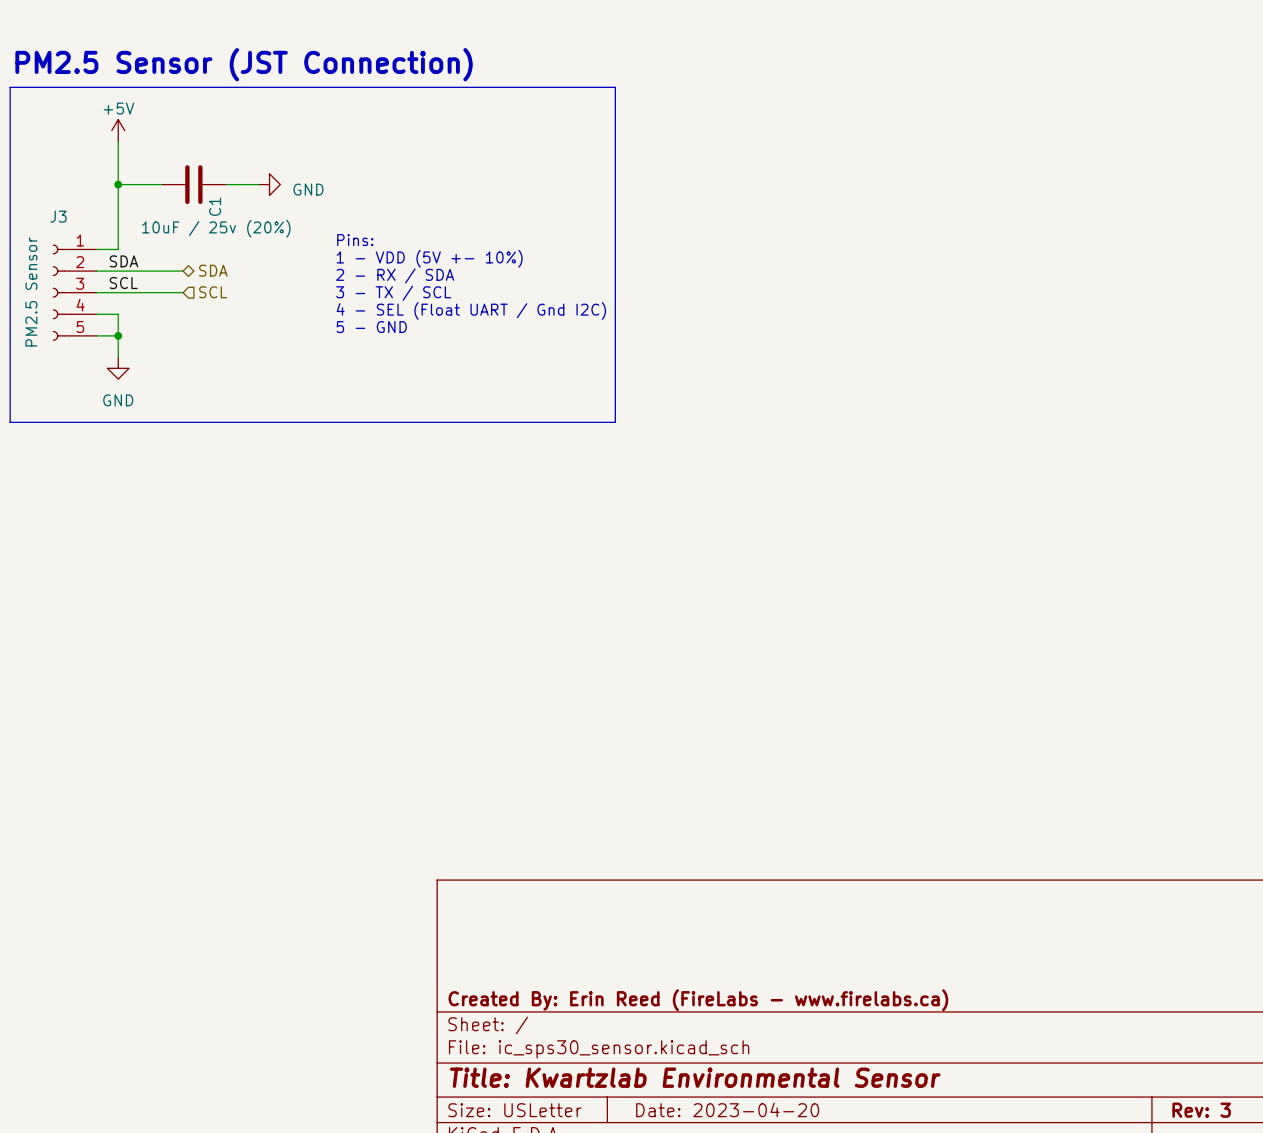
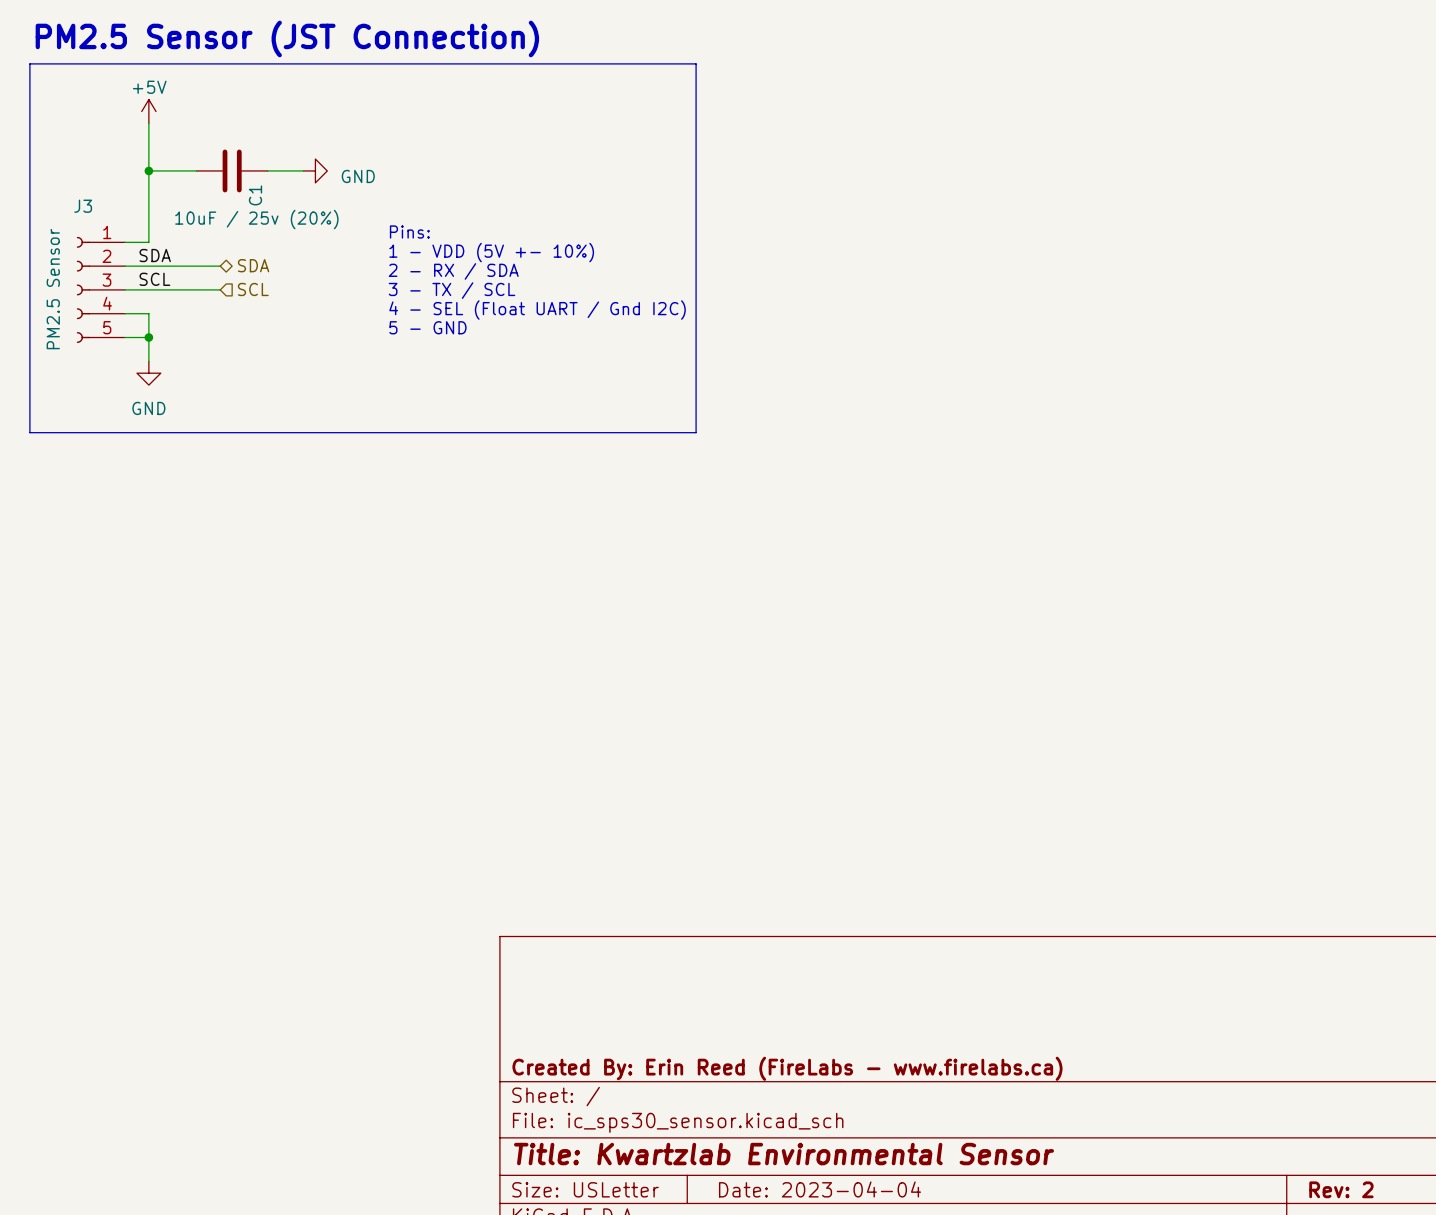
title block: Date: 2023-04-20 (727, 1109) -> Date: 2023-04-04 (820, 1189)
title block: Rev: 3 (1201, 1110) -> Rev: 2 (1341, 1189)

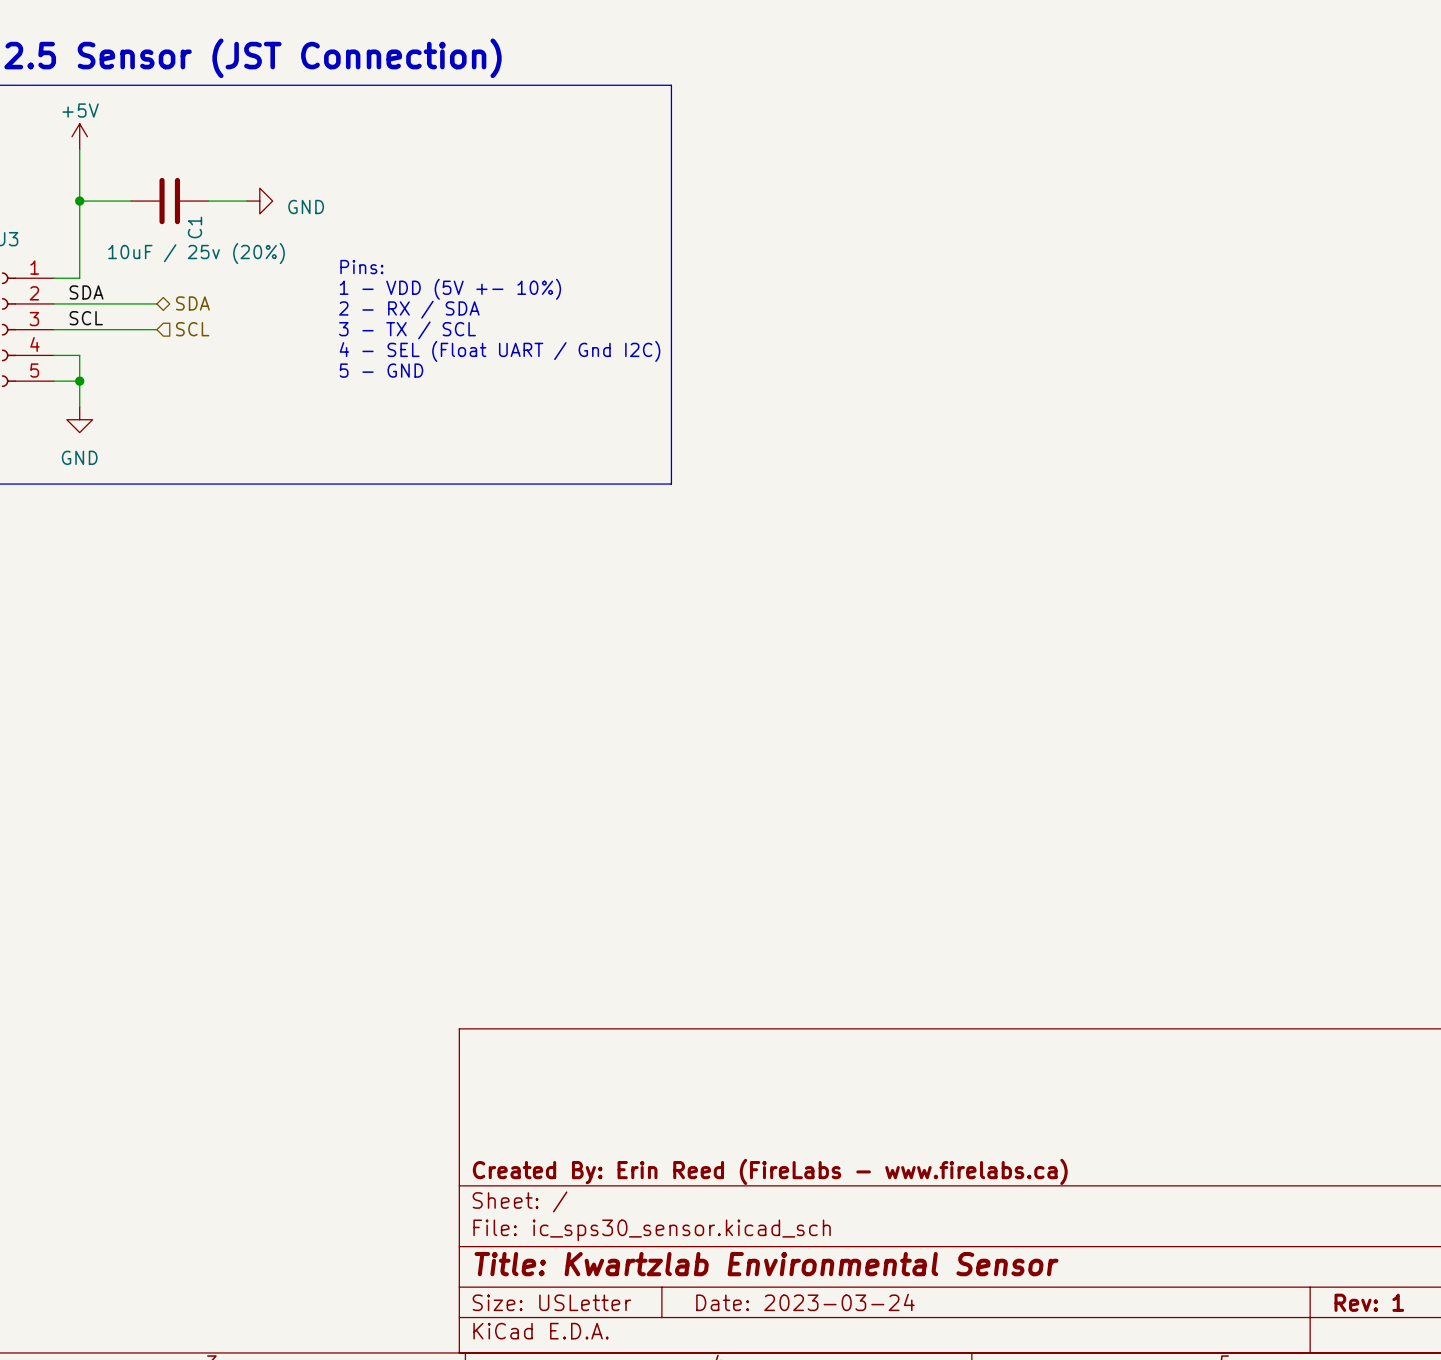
title block: Date: 2023-04-04 (820, 1189) -> Date: 2023-03-24 (805, 1302)
title block: Rev: 2 (1341, 1189) -> Rev: 1 (1369, 1302)

